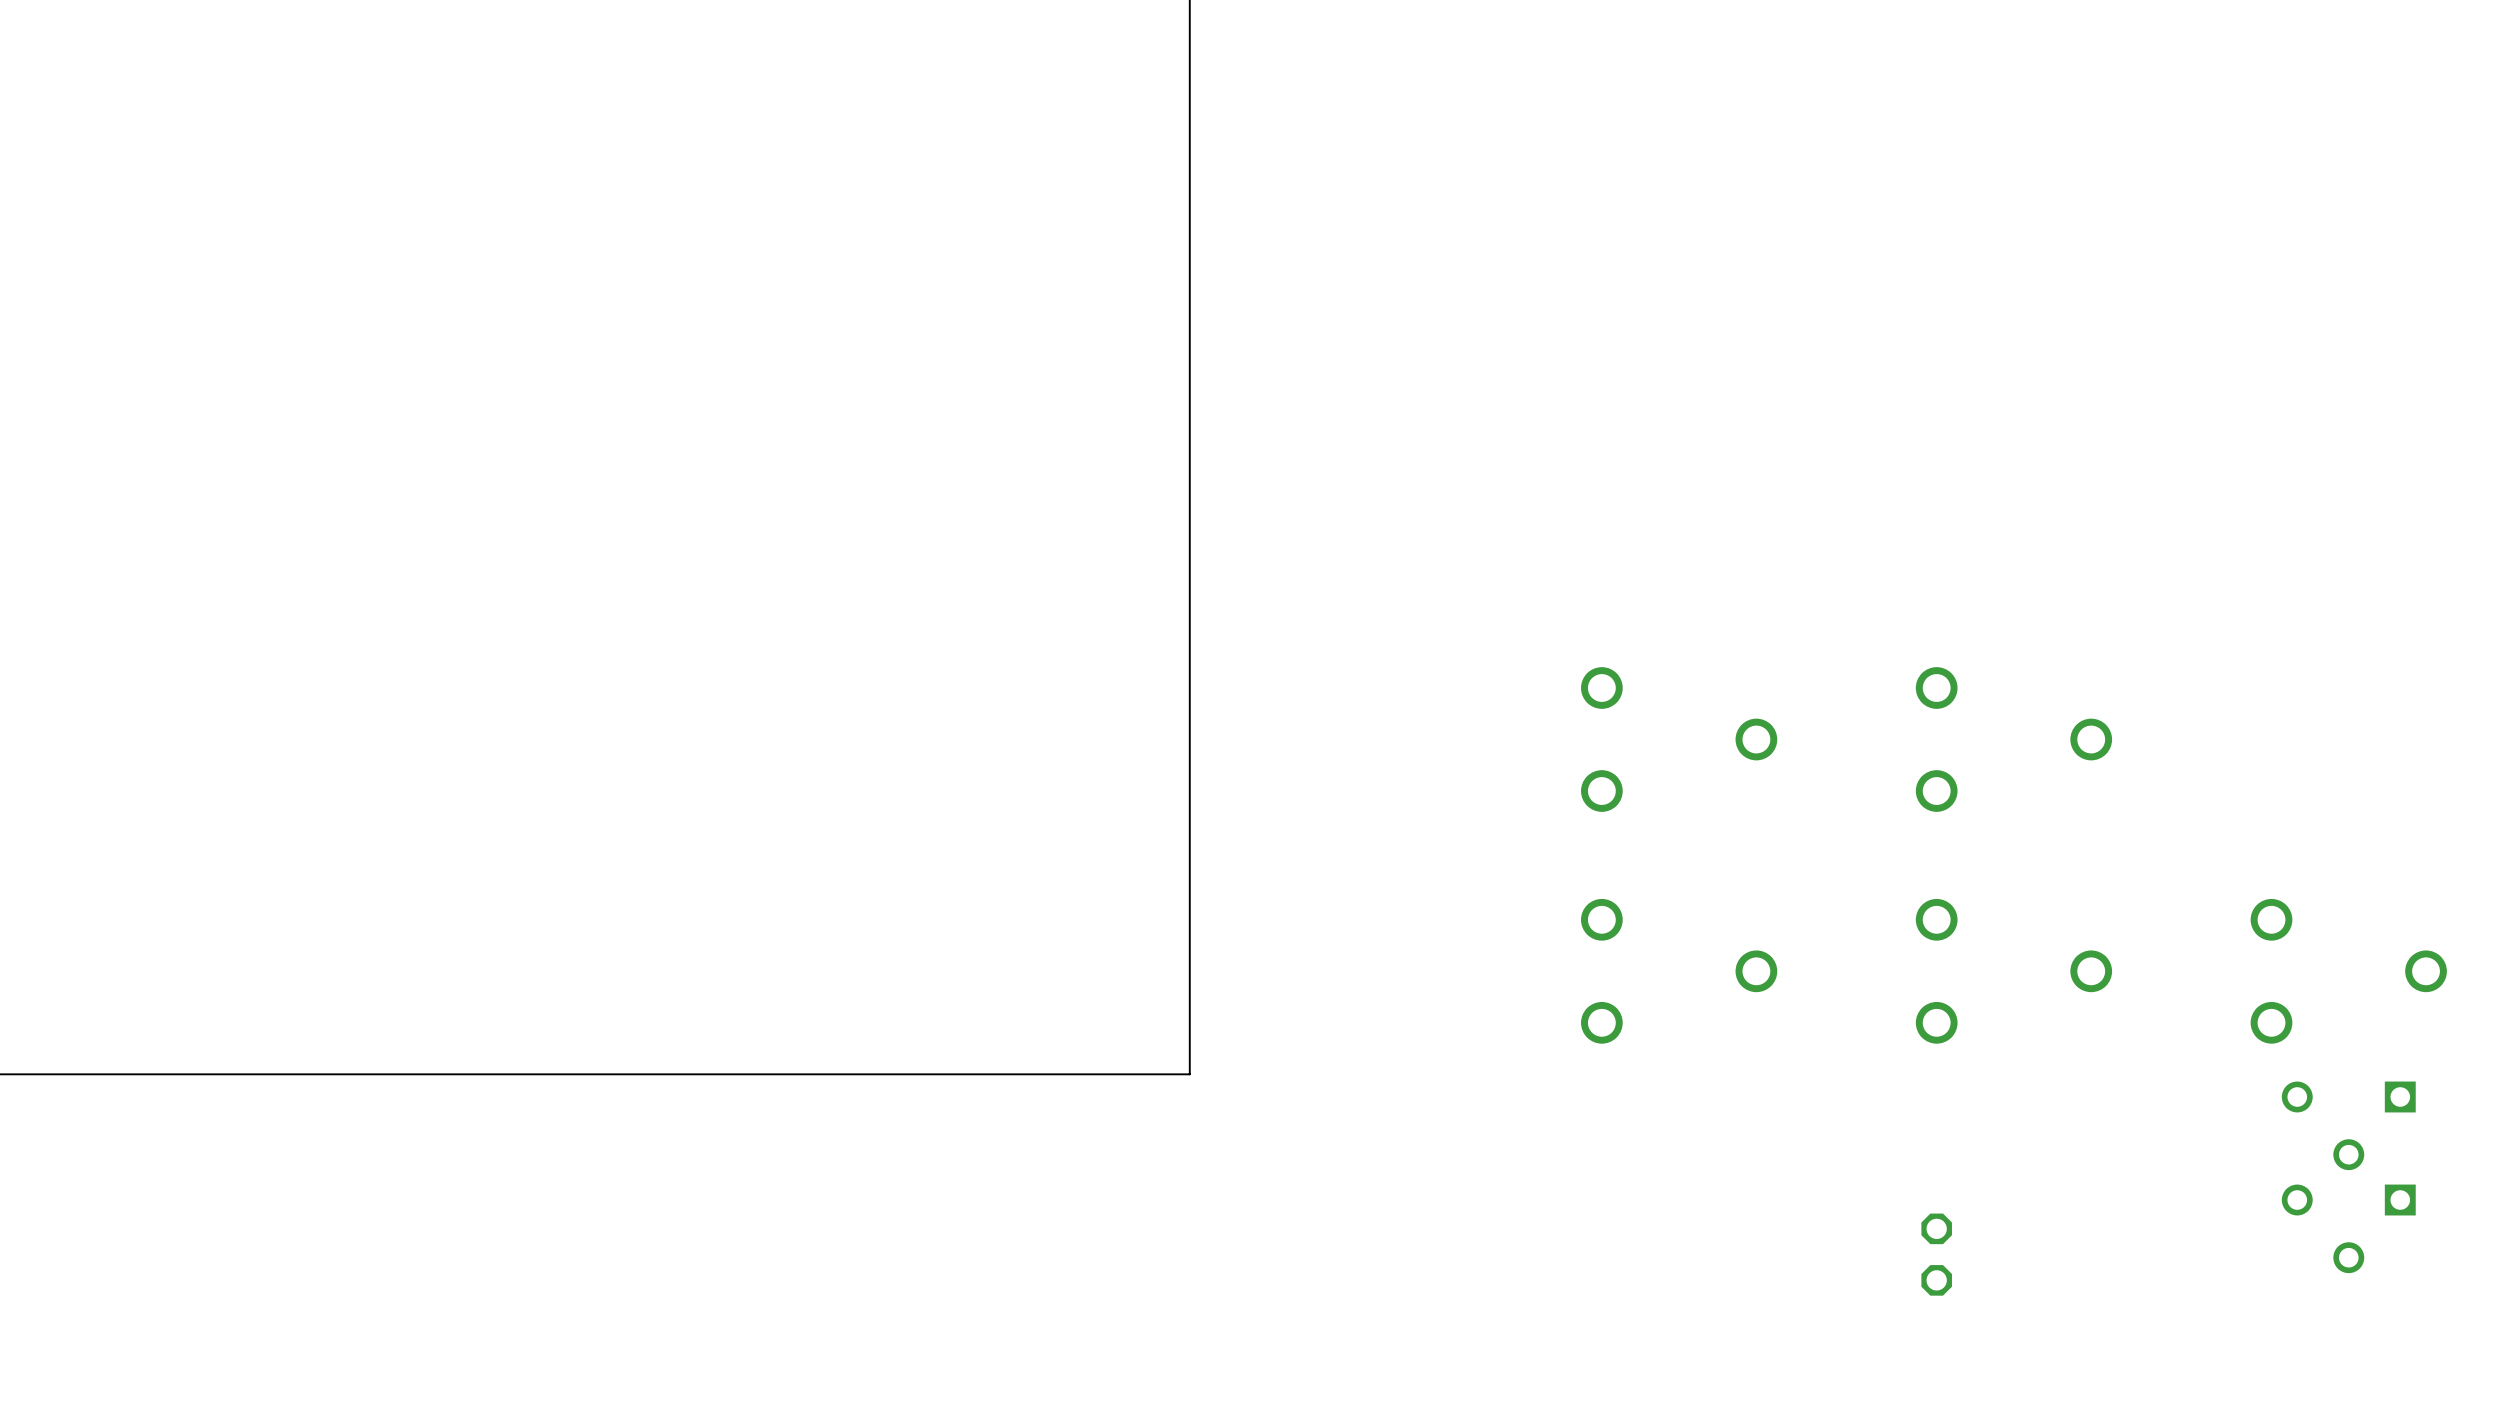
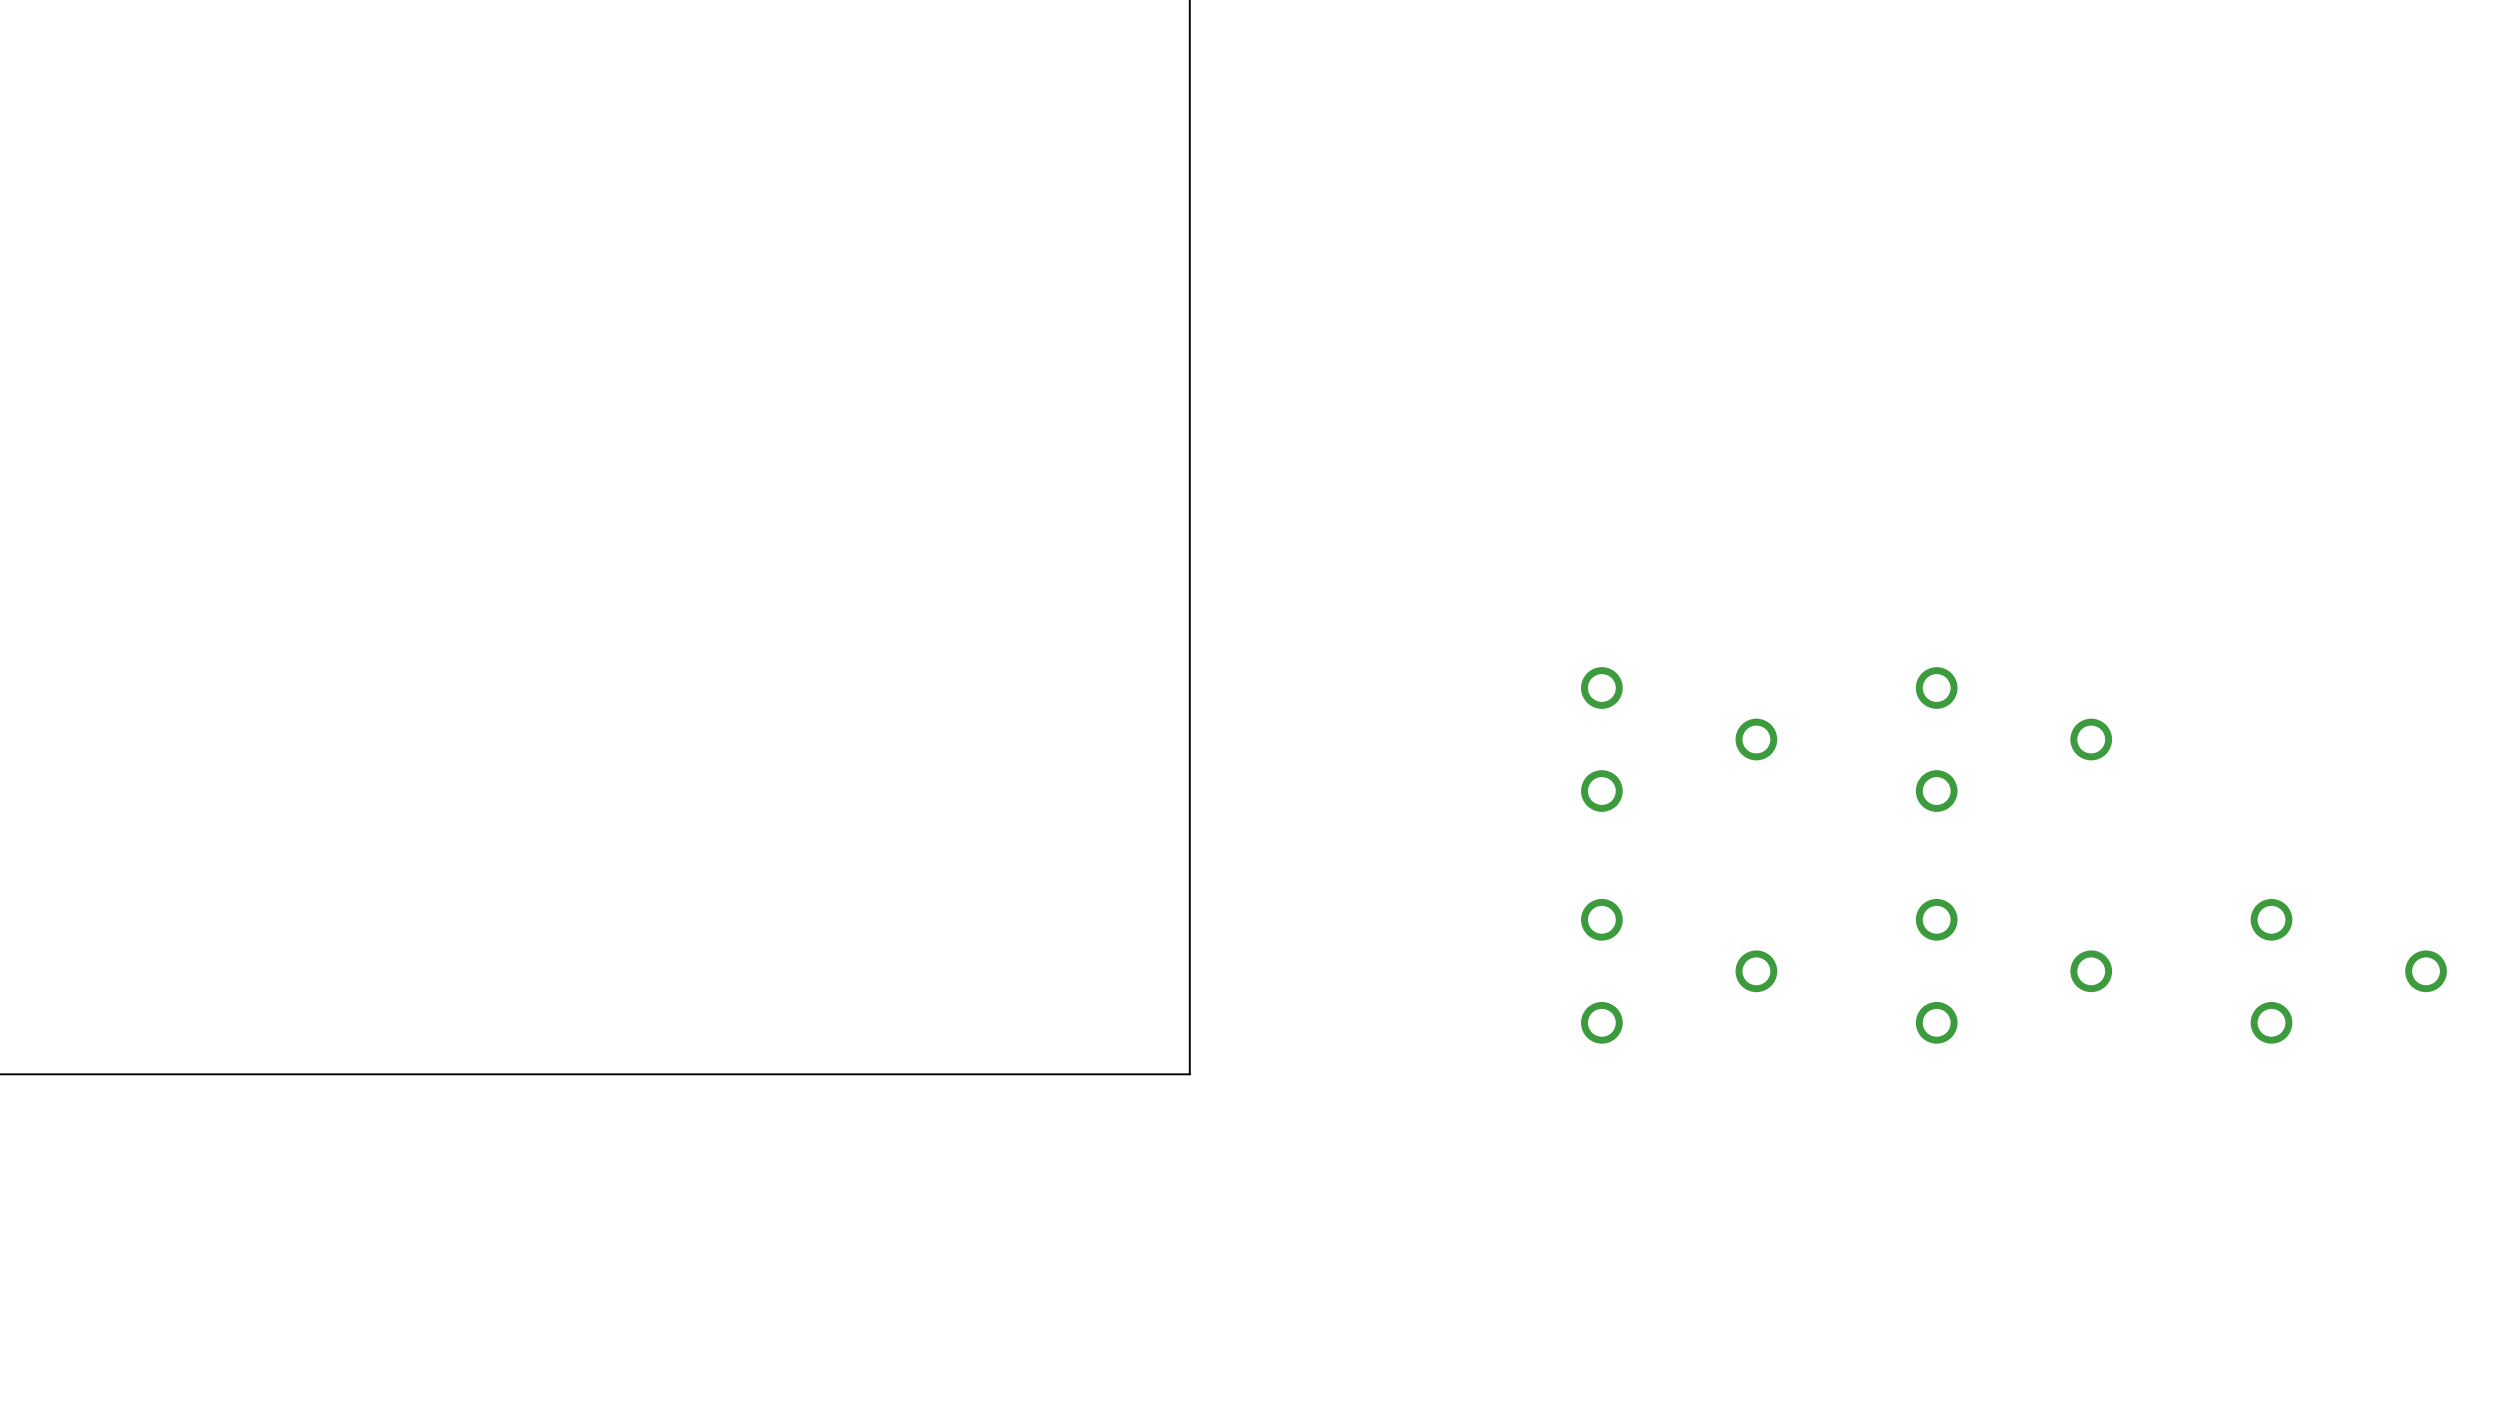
part: (2348, 1125) -> none
part: (2348, 1228) -> none
part: (1936, 1254) -> none

